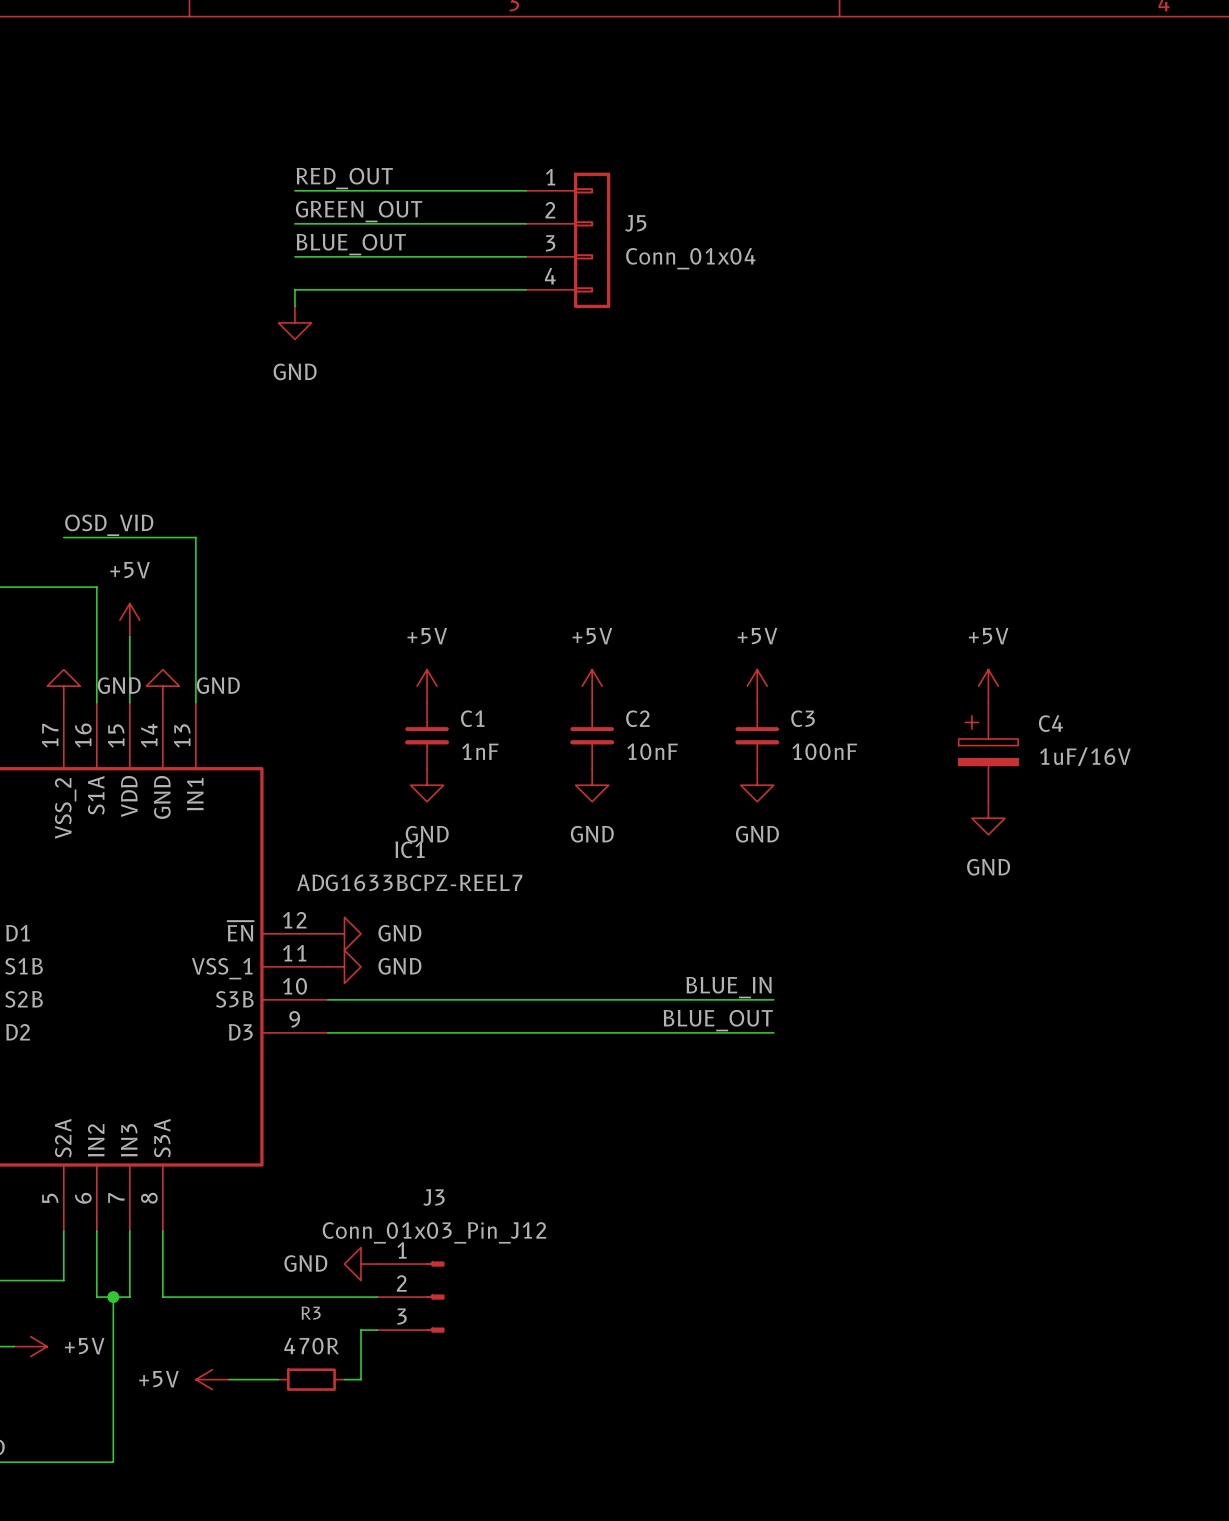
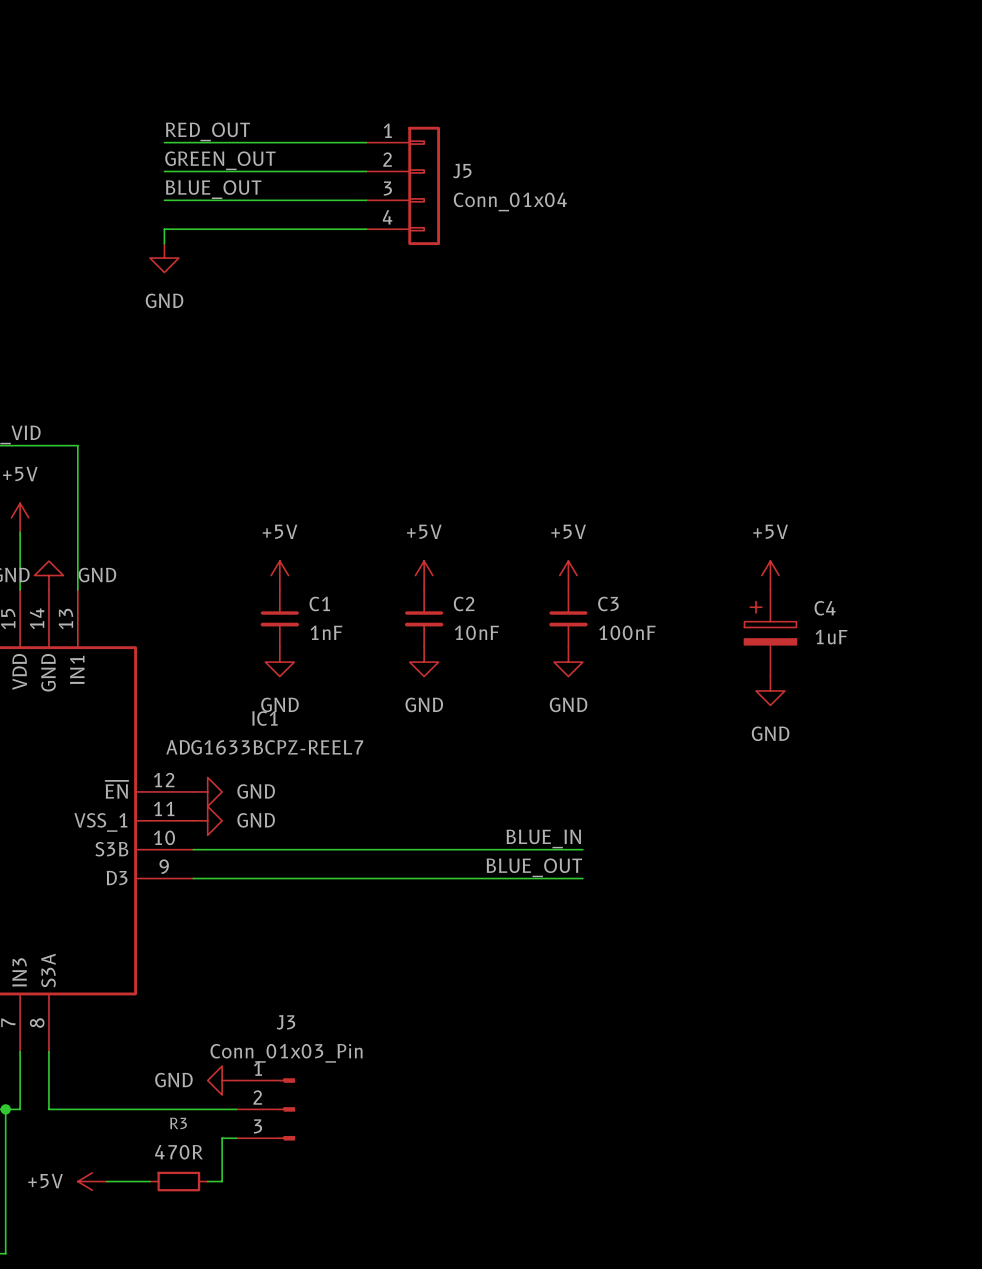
C4 value: 1uF/16V (1085, 756) -> 1uF (831, 637)
J3 value: Conn_01x03_Pin_J12 (434, 1232) -> Conn_01x03_Pin (286, 1053)

